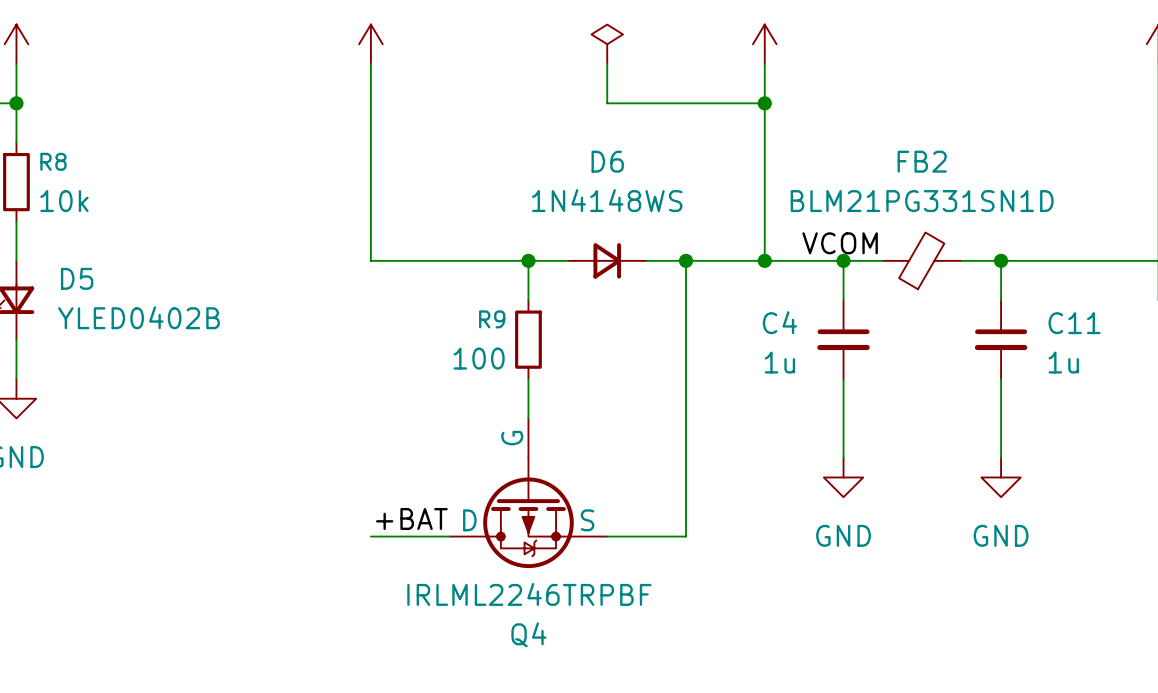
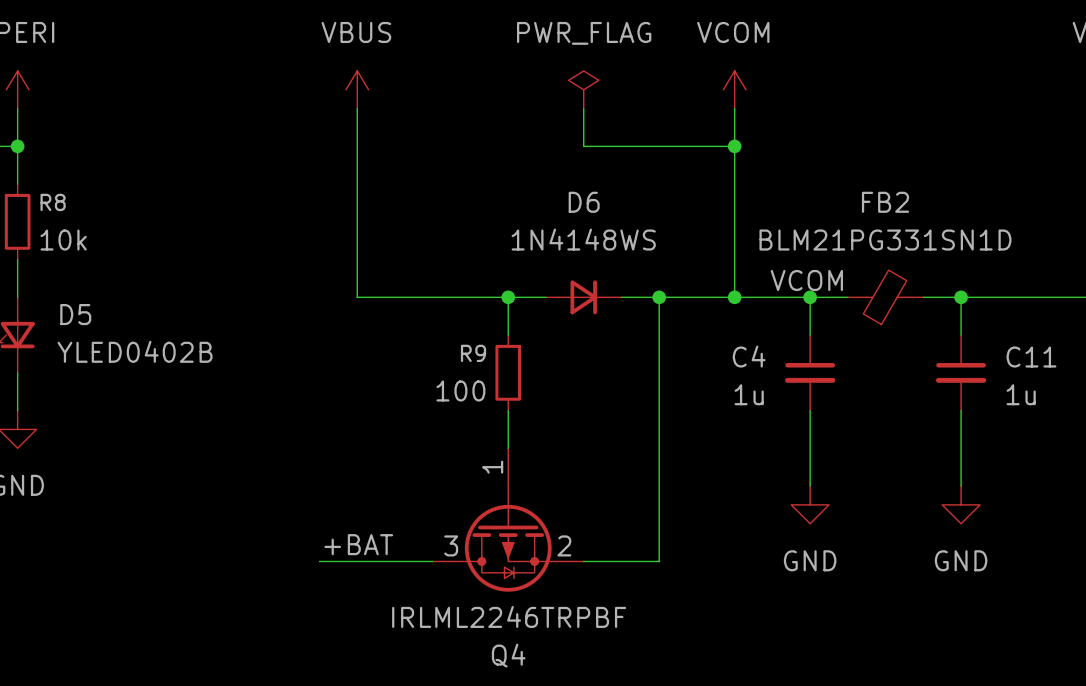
Q4 symbol: [449, 418, 608, 569] -> [432, 448, 584, 592]
label position: +BAT (411, 518) -> +BAT (358, 544)
wire: none -> (319, 561) (357, 561)

